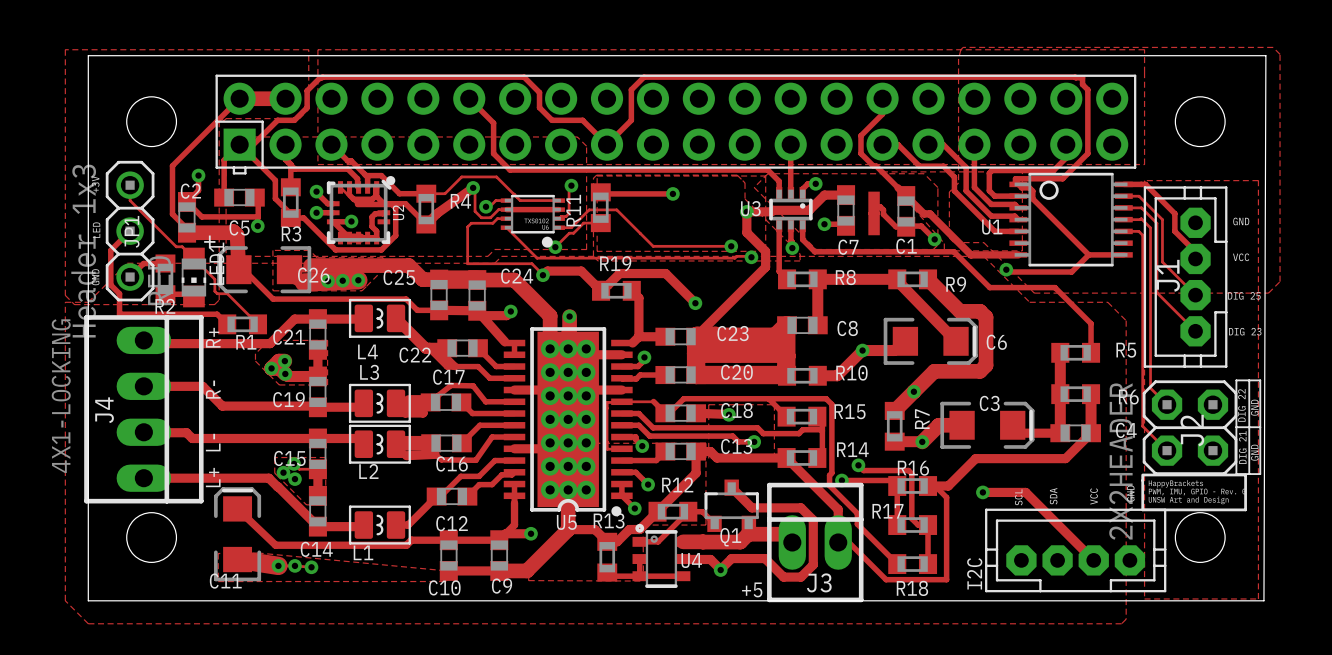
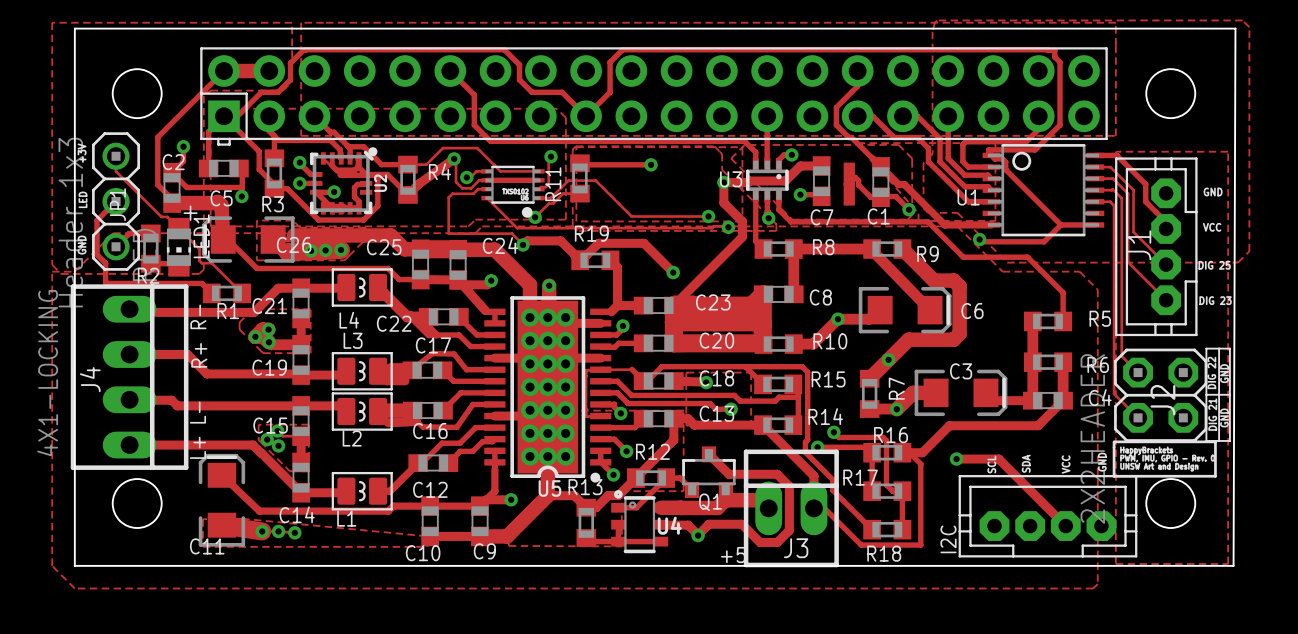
text position: R+ (213, 337) -> R+ (199, 355)
text position: R- (213, 389) -> R- (198, 316)

